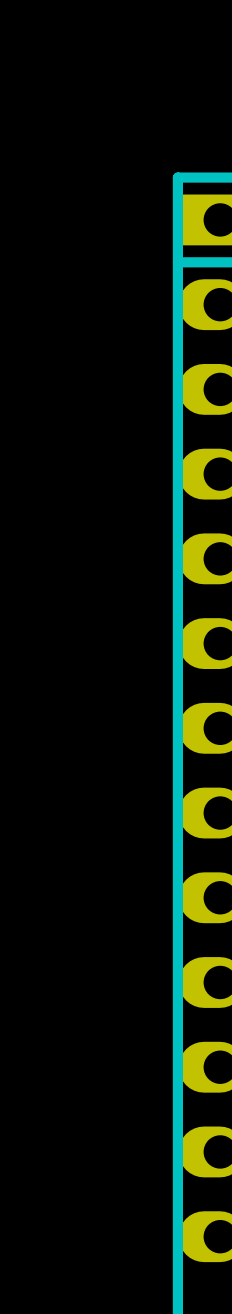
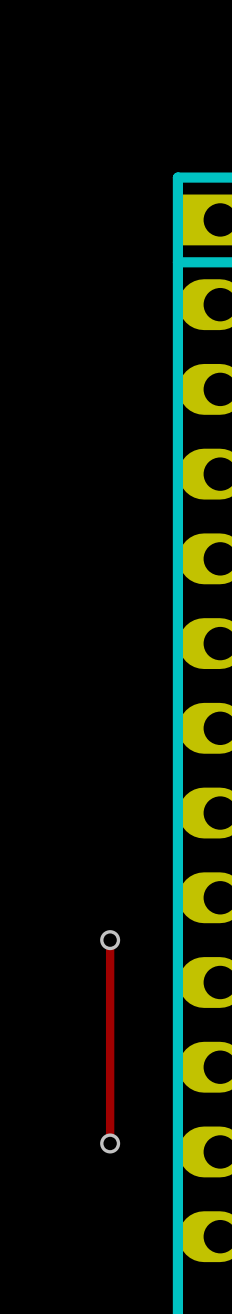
track: none -> (110, 940) (110, 1143)
via: none -> (110, 940)
via: none -> (110, 1143)

